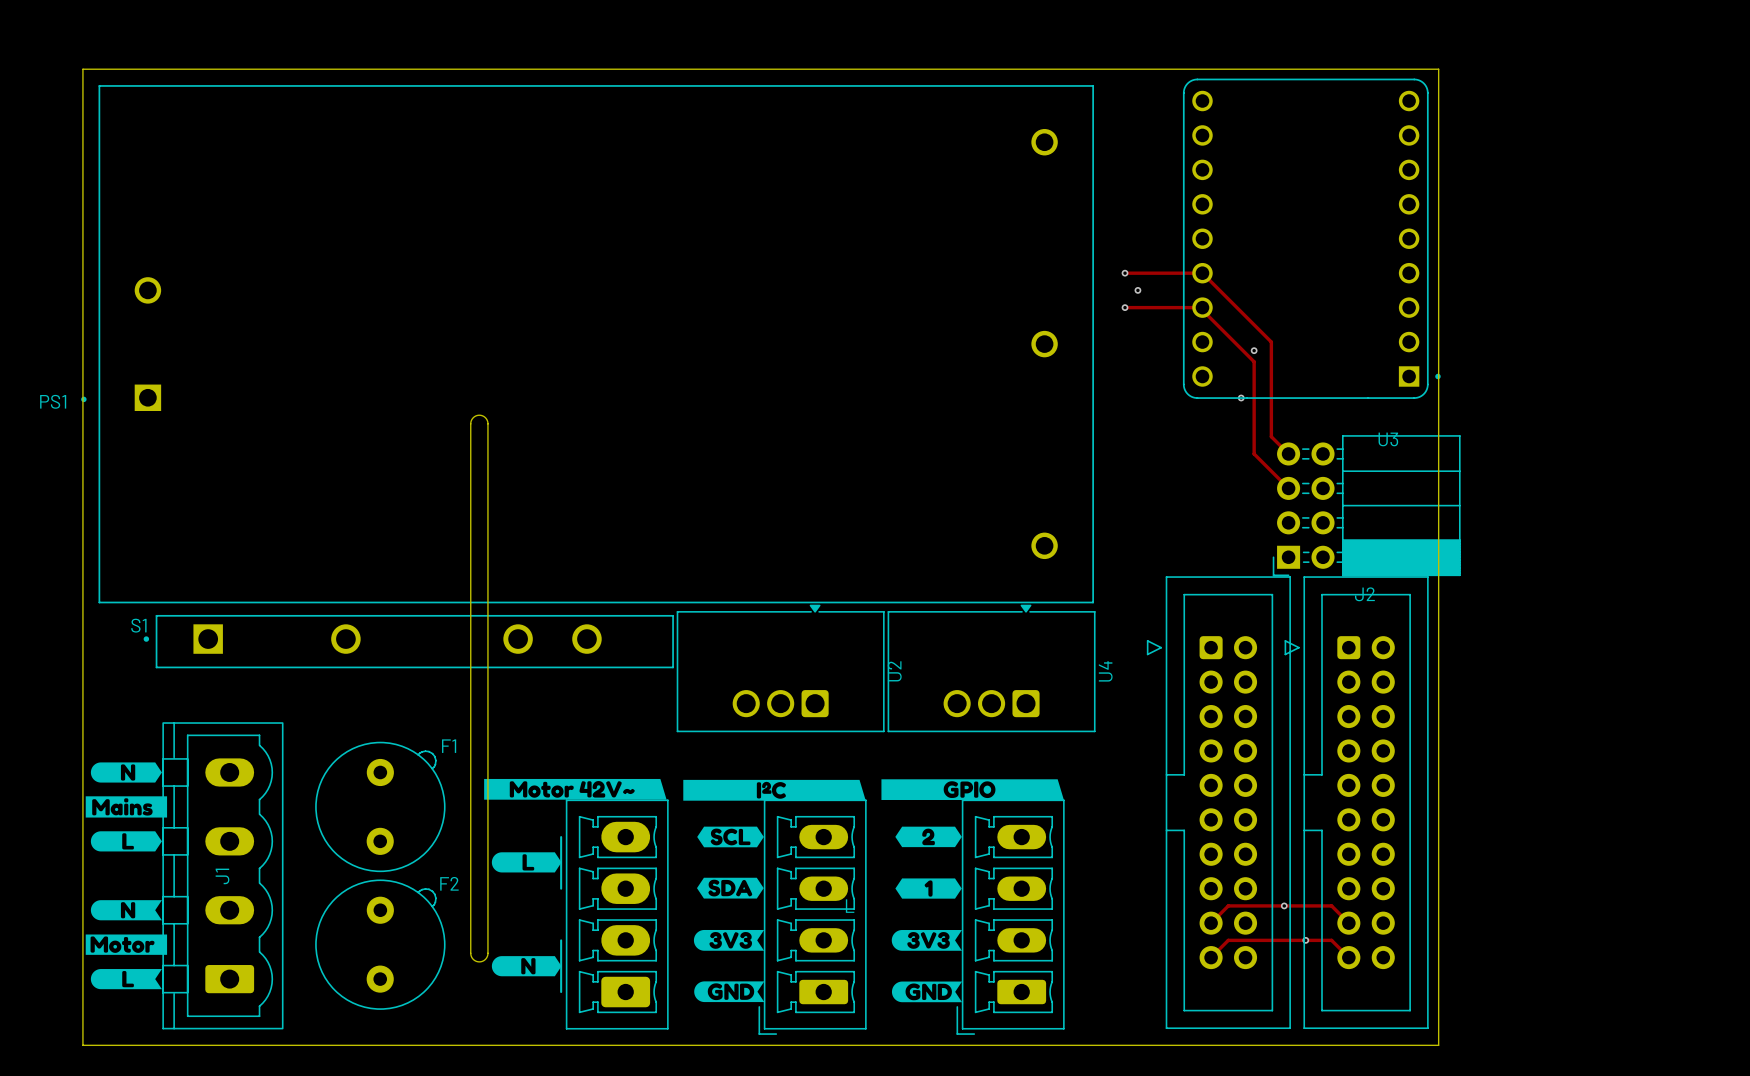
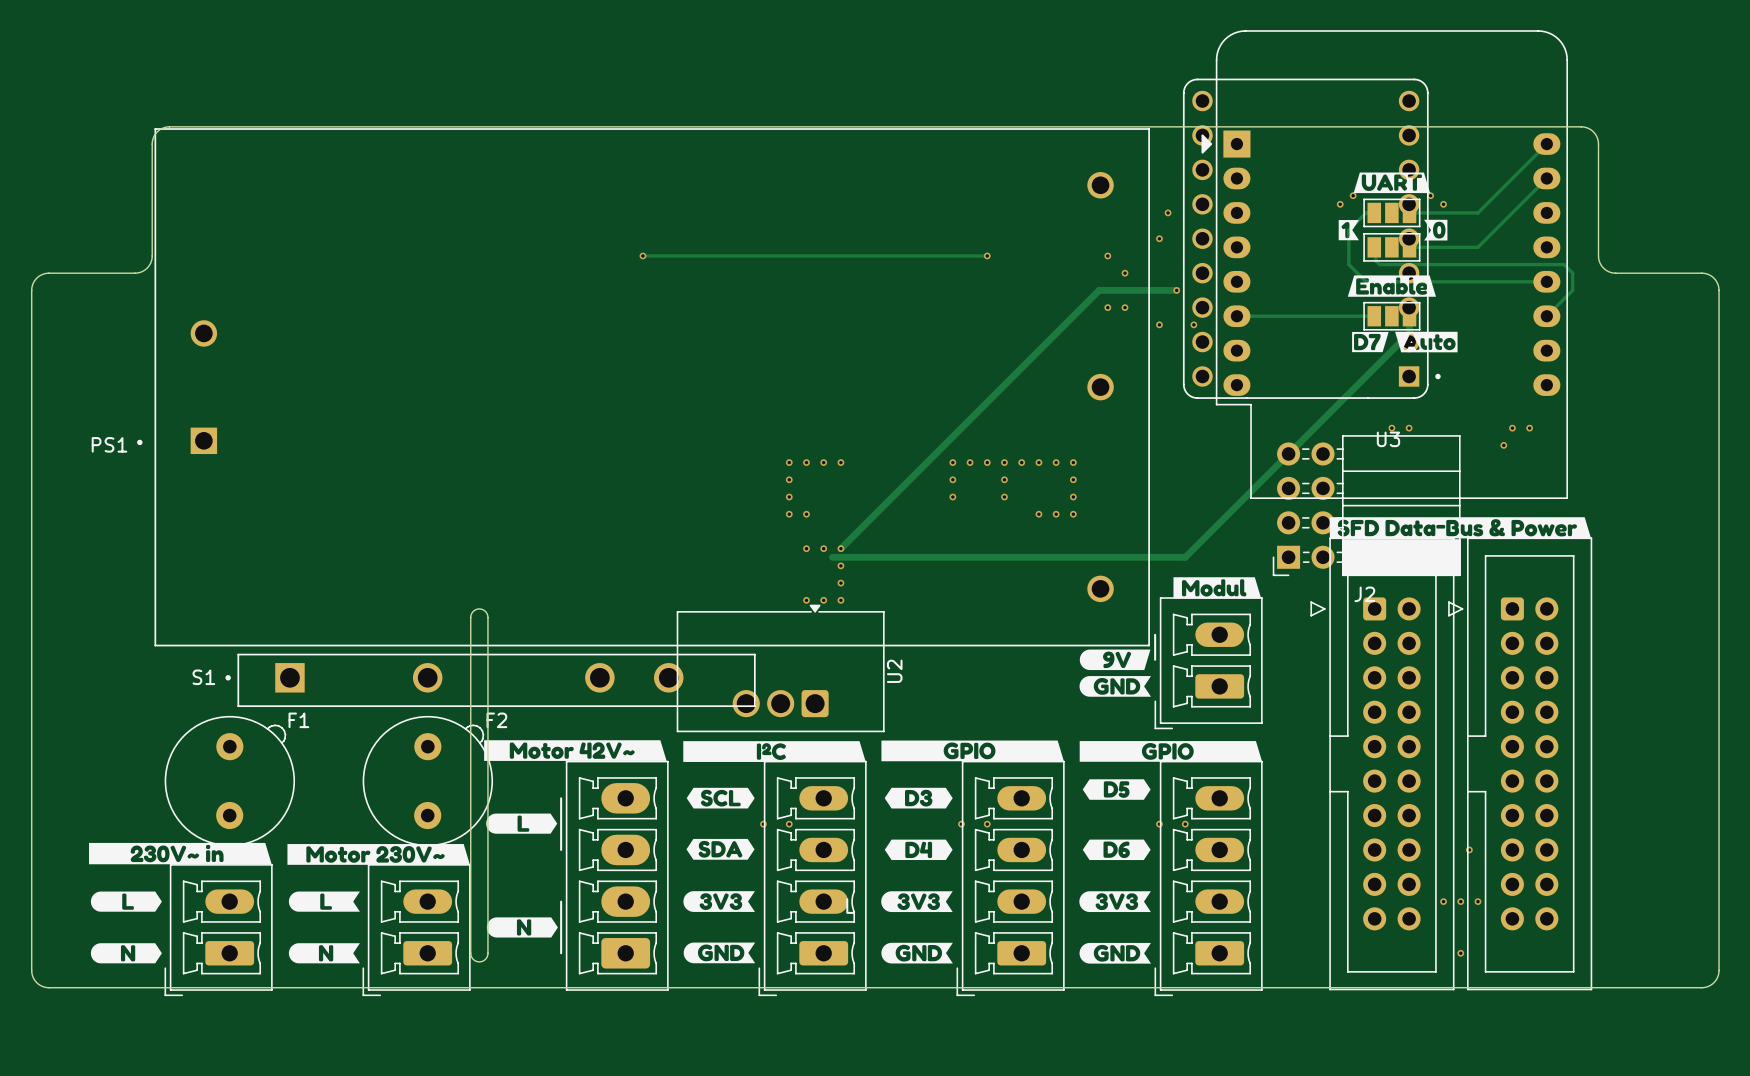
board edge: (82, 69) (1438, 69) (1438, 1045) (82, 1045) (82, 69) -> (169, 126) (157, 131) (152, 142) (152, 255) (148, 266) (136, 273) (45, 273) (35, 279) (31, 288) (31, 970) (34, 979) (41, 986) (48, 987) (1701, 987) (1710, 985) (1717, 977) (1719, 970) (1718, 288) (1713, 278) (1705, 273) (1613, 273) (1602, 266) (1598, 255) (1598, 142) (1594, 133) (1588, 128) (1581, 126) (169, 126)
track: none -> (1546, 144) (1477, 212) (1411, 212)
drawing: none -> [1353, 172, 1431, 194]
track: none -> (1546, 178) (1477, 247) (1411, 247)
via: none -> (1353, 195)
via: none -> (1430, 195)
via: none -> (1340, 204)
via: none -> (1443, 204)
via: none -> (1168, 212)
track: none -> (1375, 212) (1366, 212) (1348, 230) (1348, 264) (1366, 281) (1546, 281)
part: none -> (1391, 212)
drawing: none -> [1424, 219, 1448, 241]
drawing: none -> [1338, 220, 1359, 241]
via: none -> (1159, 238)
track: none -> (1375, 247) (1375, 260) (1379, 264) (1564, 264) (1572, 273) (1572, 290) (1546, 316)
part: none -> (1391, 247)
track: none -> (642, 255) (987, 255)
via: none -> (642, 255)
via: none -> (987, 255)
via: none -> (1107, 255)
part: none -> (1384, 264)
track: (1125, 273) (1202, 273) (1271, 342) (1271, 436) (1288, 453) -> none
drawing: none -> [1347, 275, 1436, 297]
via: (1137, 290) -> none
track: none -> (1176, 290) (1099, 290) (840, 548)
via: none -> (1176, 290)
via: none -> (1107, 307)
track: (1125, 307) (1202, 307) (1202, 310) (1254, 361) (1254, 453) (1288, 488) -> none
track: none -> (1236, 316) (1374, 316)
part: none -> (1391, 316)
track: none -> (1409, 316) (1409, 333) (1185, 557) (832, 557)
via: none -> (1159, 324)
via: none -> (1193, 324)
drawing: none -> [1352, 331, 1458, 353]
PS1 position: (587, 344) -> (643, 387)
via: (1254, 350) -> none
via: (1241, 398) -> none
via: none -> (1391, 428)
via: none -> (1409, 428)
via: none -> (1512, 428)
via: none -> (1529, 428)
via: none -> (1503, 445)
via: none -> (789, 462)
via: none -> (806, 462)
via: none -> (823, 462)
via: none -> (840, 462)
via: none -> (952, 462)
via: none -> (970, 462)
via: none -> (987, 462)
via: none -> (1004, 462)
via: none -> (1021, 462)
via: none -> (1038, 462)
via: none -> (1056, 462)
via: none -> (1073, 462)
via: none -> (789, 479)
via: none -> (952, 479)
via: none -> (1004, 479)
via: none -> (1073, 479)
via: none -> (789, 497)
via: none -> (952, 497)
via: none -> (1004, 497)
via: none -> (1073, 497)
via: none -> (789, 514)
via: none -> (806, 514)
via: none -> (1038, 514)
via: none -> (1056, 514)
via: none -> (1073, 514)
drawing: none -> [1329, 517, 1592, 539]
via: none -> (806, 548)
via: none -> (823, 548)
via: none -> (840, 548)
via: none -> (840, 565)
drawing: none -> [1173, 577, 1262, 599]
via: none -> (840, 583)
via: none -> (806, 600)
via: none -> (823, 600)
via: none -> (840, 600)
board edge: (470, 617) (470, 423) (473, 417) (479, 415) (485, 417) (487, 423) (487, 617) -> (470, 617) (473, 611) (479, 608) (485, 611) (487, 617)
S1 name position: S1 (138, 625) -> S1 (203, 677)
line: none -> (1155, 634) (1155, 659)
S1 position: (408, 641) -> (490, 680)
drawing: none -> [1079, 649, 1152, 697]
part: none -> (1208, 663)
U4: (991, 668) -> none
drawing: none -> [1079, 741, 1263, 762]
part: none -> (1520, 763)
drawing position: (126, 772) -> (126, 953)
drawing: none -> [1082, 779, 1151, 800]
drawing: none -> [686, 787, 755, 809]
drawing: none -> [884, 787, 953, 809]
drawing position: (575, 789) -> (575, 750)
drawing position: (972, 789) -> (972, 750)
drawing position: (774, 790) -> (774, 751)
drawing: [85, 796, 168, 818] -> none
part: (1218, 802) -> none
part position: (1356, 802) -> (1382, 763)
F1 position: (380, 806) -> (229, 781)
drawing: none -> [486, 813, 558, 834]
via: none -> (763, 824)
via: none -> (789, 824)
via: none -> (961, 824)
via: none -> (987, 824)
via: none -> (1159, 824)
via: none -> (1185, 824)
drawing: [697, 826, 764, 848] -> none
drawing: [895, 826, 962, 848] -> none
drawing: none -> [686, 838, 755, 860]
drawing: none -> [884, 839, 953, 861]
drawing: none -> [1082, 839, 1151, 861]
drawing position: (126, 841) -> (126, 901)
drawing: none -> [89, 842, 470, 865]
line: (561, 849) (561, 888) -> (561, 798) (561, 837)
via: none -> (1469, 849)
drawing: [491, 852, 562, 873] -> none
J1: (222, 875) -> none
drawing: [696, 877, 764, 899] -> none
drawing: [895, 878, 962, 899] -> none
part: none -> (1208, 878)
drawing: none -> [683, 891, 755, 912]
drawing: none -> [881, 891, 953, 913]
drawing: none -> [1079, 891, 1151, 913]
via: none -> (1443, 901)
via: none -> (1460, 901)
via: none -> (1477, 901)
via: (1284, 905) -> none
drawing position: (126, 910) -> (324, 953)
part position: (617, 914) -> (617, 875)
drawing: none -> [486, 917, 558, 938]
part position: (812, 917) -> (812, 878)
part position: (1010, 917) -> (1010, 878)
track: (1211, 923) (1228, 905) (1331, 905) (1348, 923) -> none
drawing: [693, 929, 765, 951] -> none
part: none -> (218, 930)
part: none -> (416, 930)
drawing: [891, 930, 962, 951] -> none
drawing: [85, 934, 168, 955] -> none
via: (1305, 940) -> none
drawing: none -> [683, 942, 756, 964]
drawing: none -> [881, 942, 953, 964]
drawing: none -> [1079, 942, 1152, 964]
F2 position: (380, 944) -> (427, 781)
line: (561, 953) (561, 992) -> (561, 901) (561, 940)
via: none -> (1460, 953)
drawing: [491, 956, 562, 977] -> none
track: (1211, 957) (1228, 940) (1331, 940) (1348, 957) -> none
drawing position: (126, 979) -> (324, 901)
drawing: [694, 981, 765, 1003] -> none
drawing: [891, 981, 963, 1003] -> none

